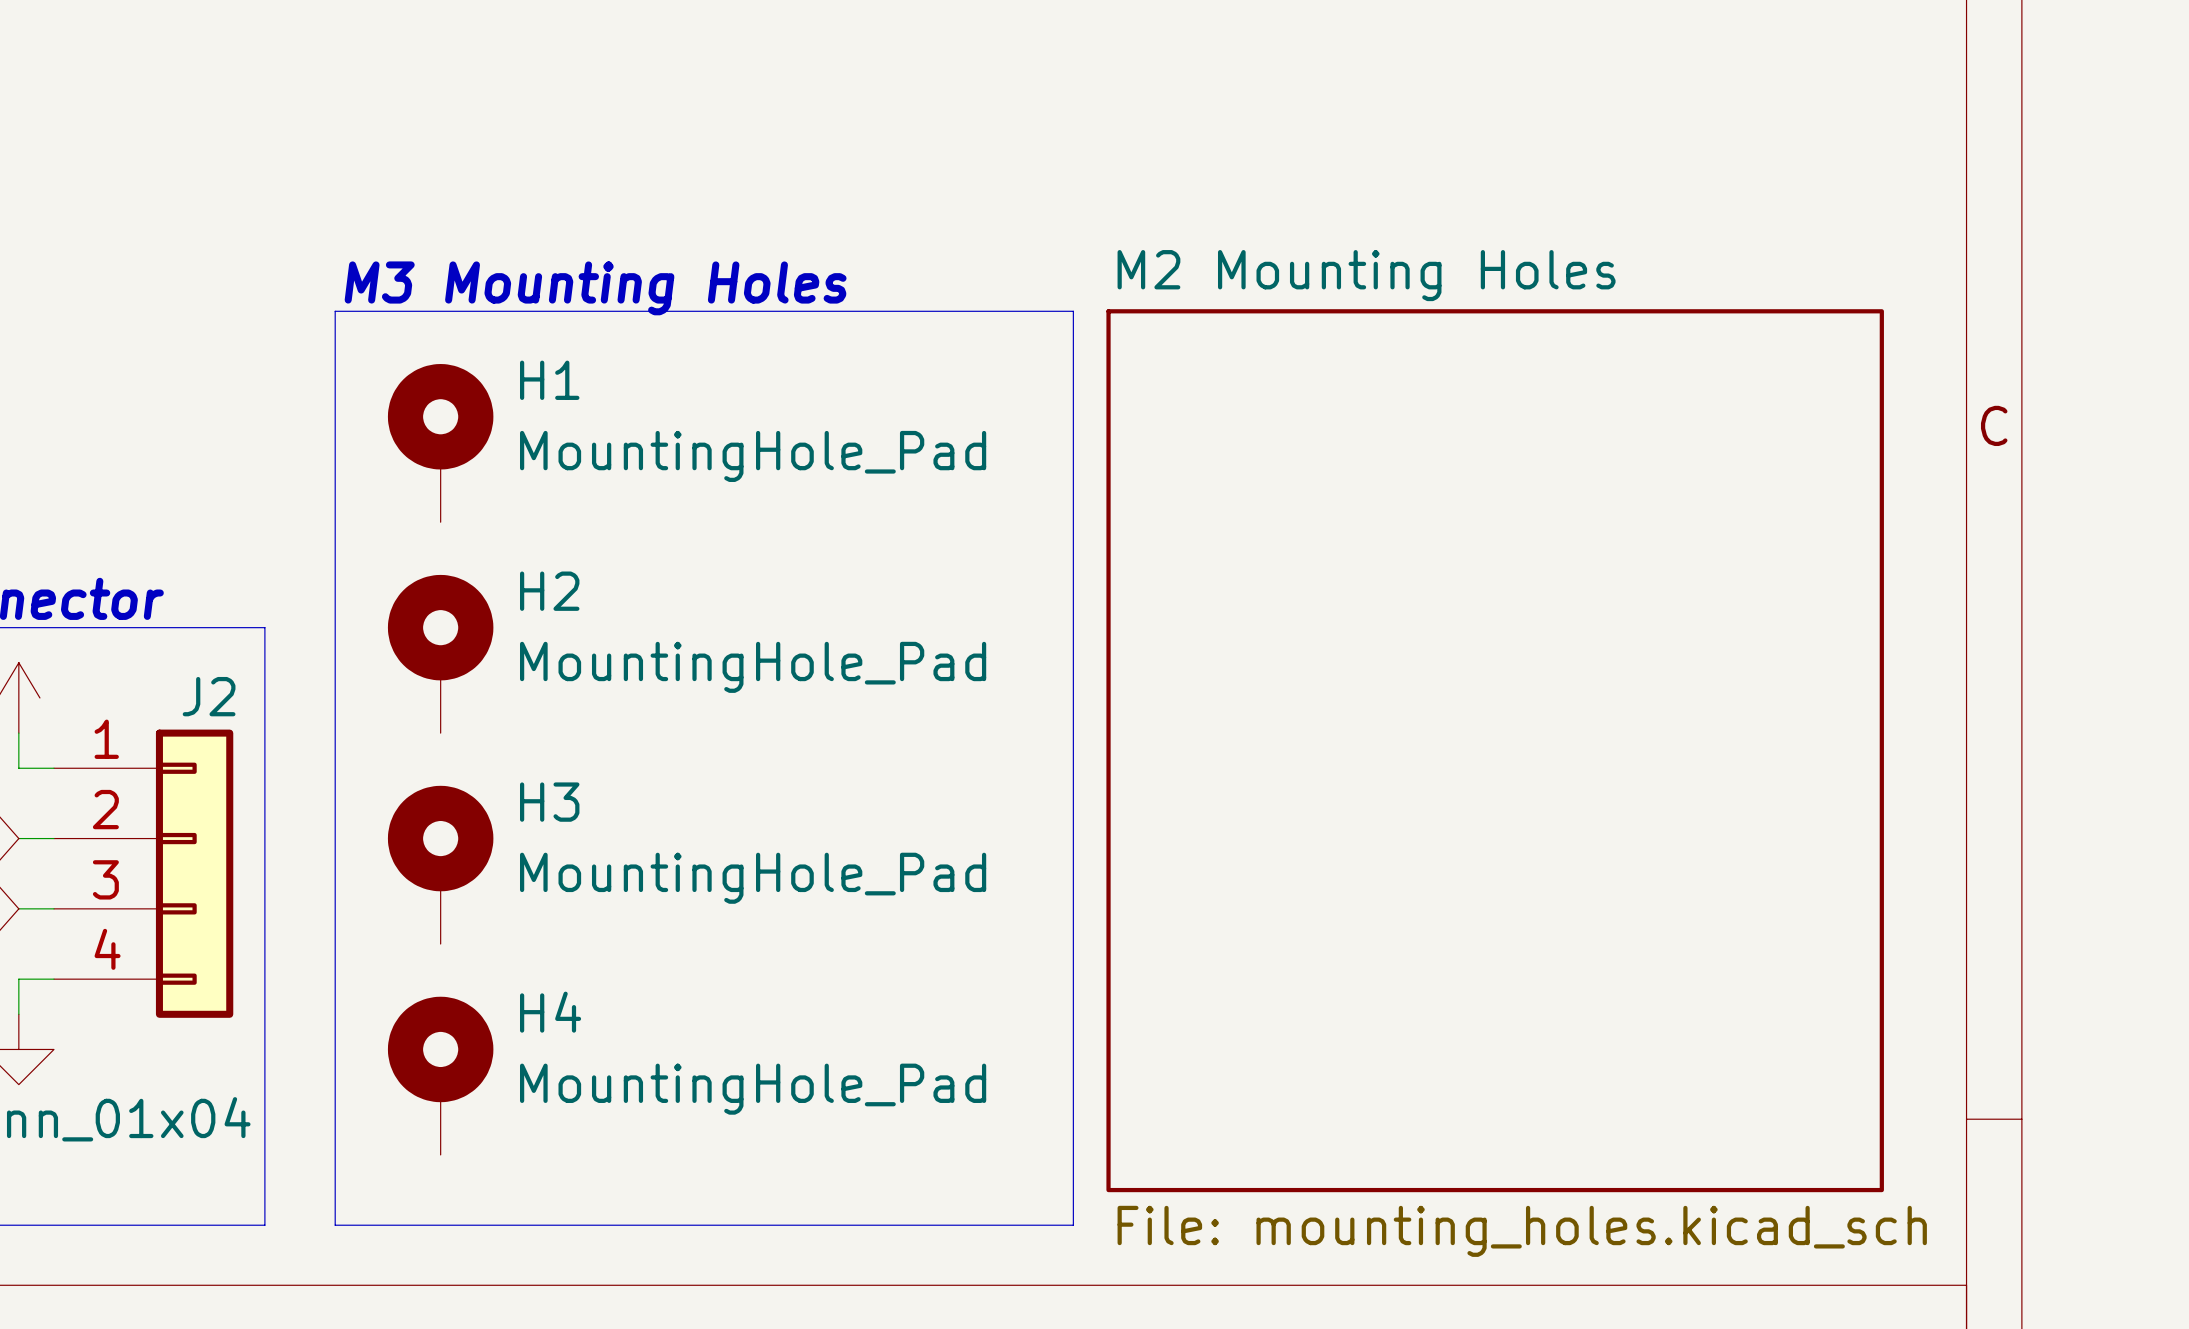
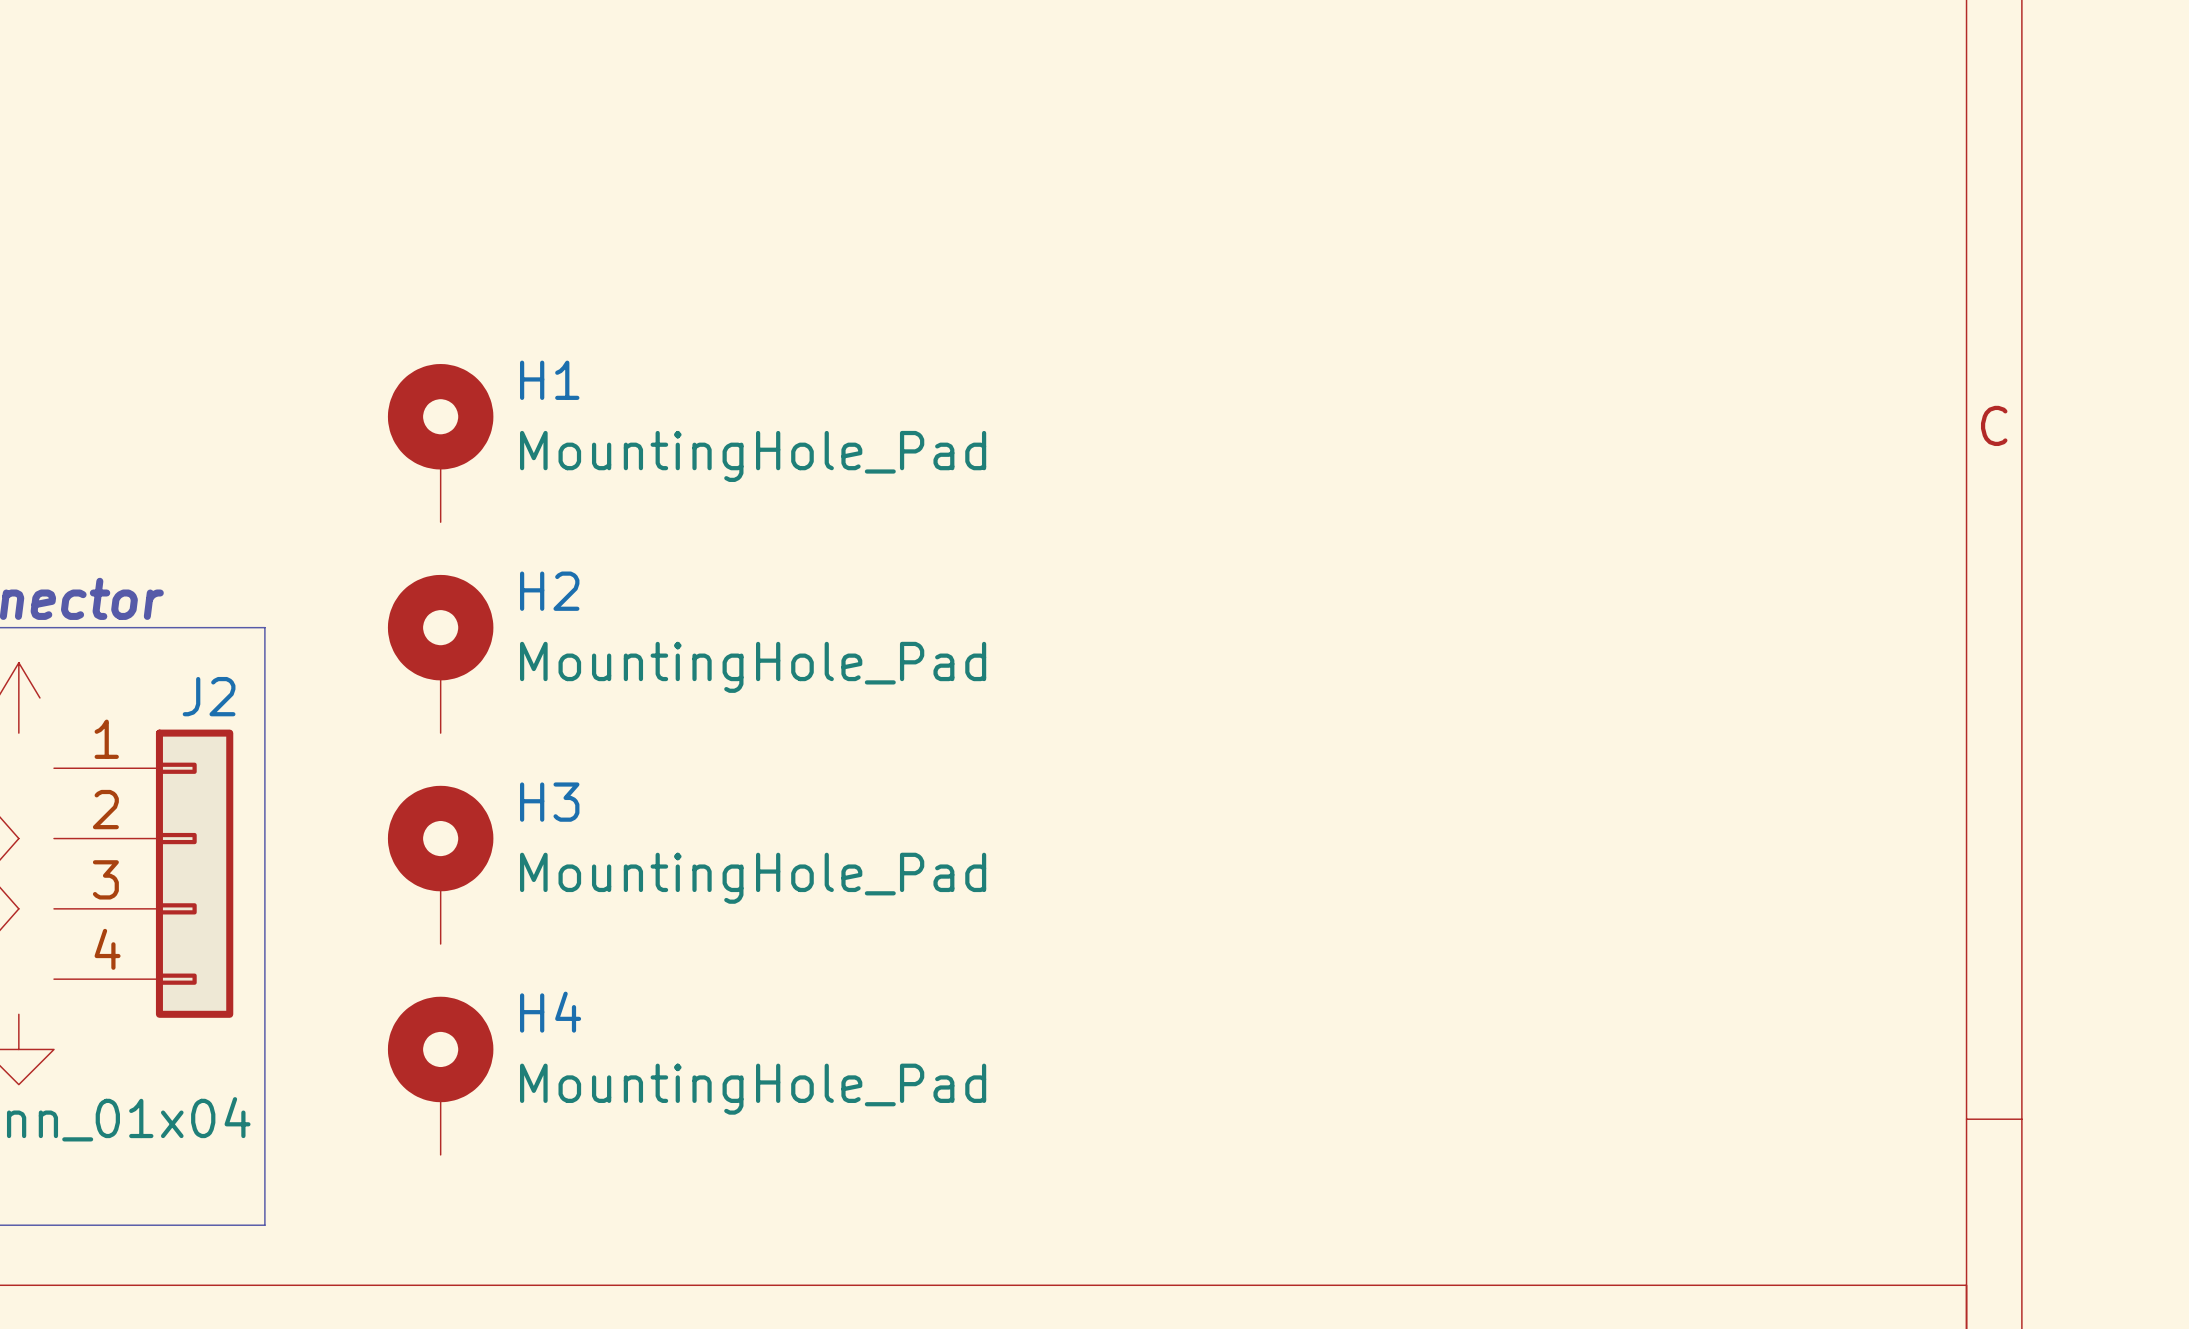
text: M3 Mounting Holes (595, 288) -> none
line: (335, 311) (335, 1225) (1073, 1225) (1073, 311) (335, 311) -> none
wire: (18, 733) (18, 768) (53, 768) -> none
sheet M2 Mounting Holes: File: mounting_holes.kicad_sch (1495, 750) -> none
wire: (18, 838) (53, 838) -> none
wire: (18, 908) (53, 908) -> none
wire: (53, 979) (18, 979) (18, 1014) -> none

